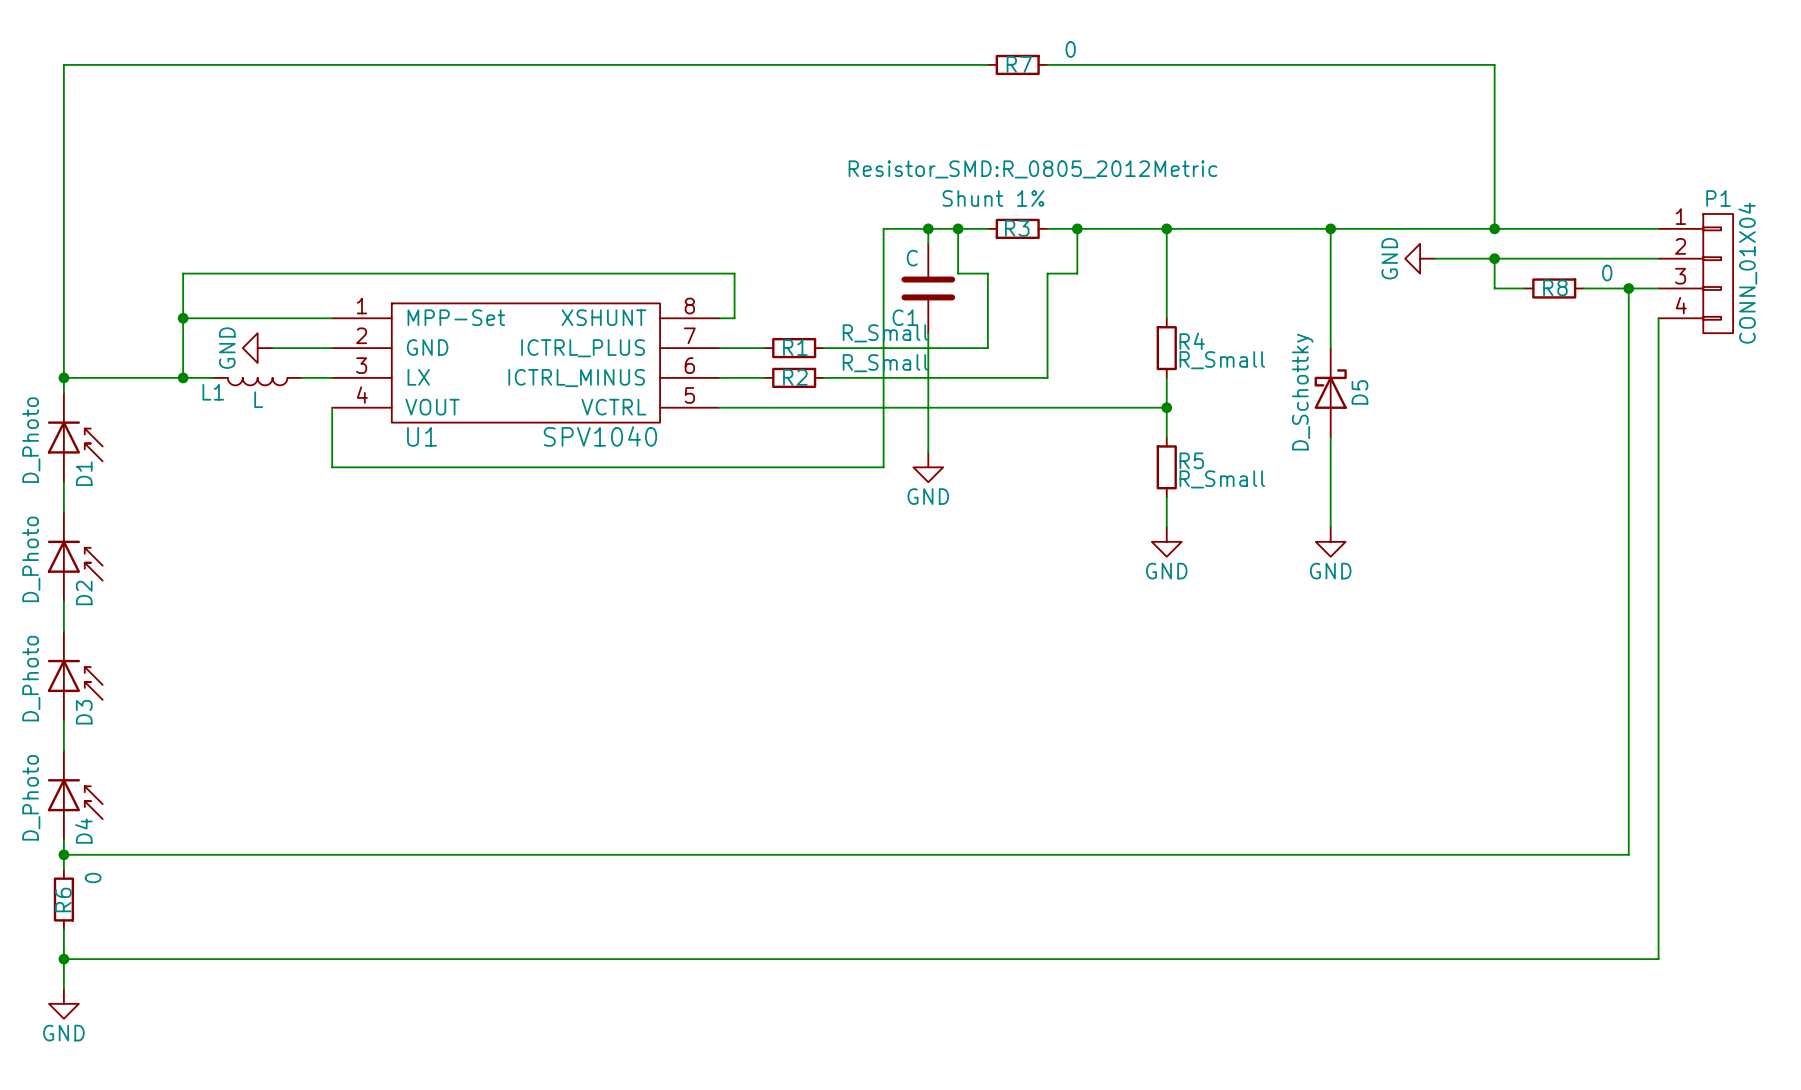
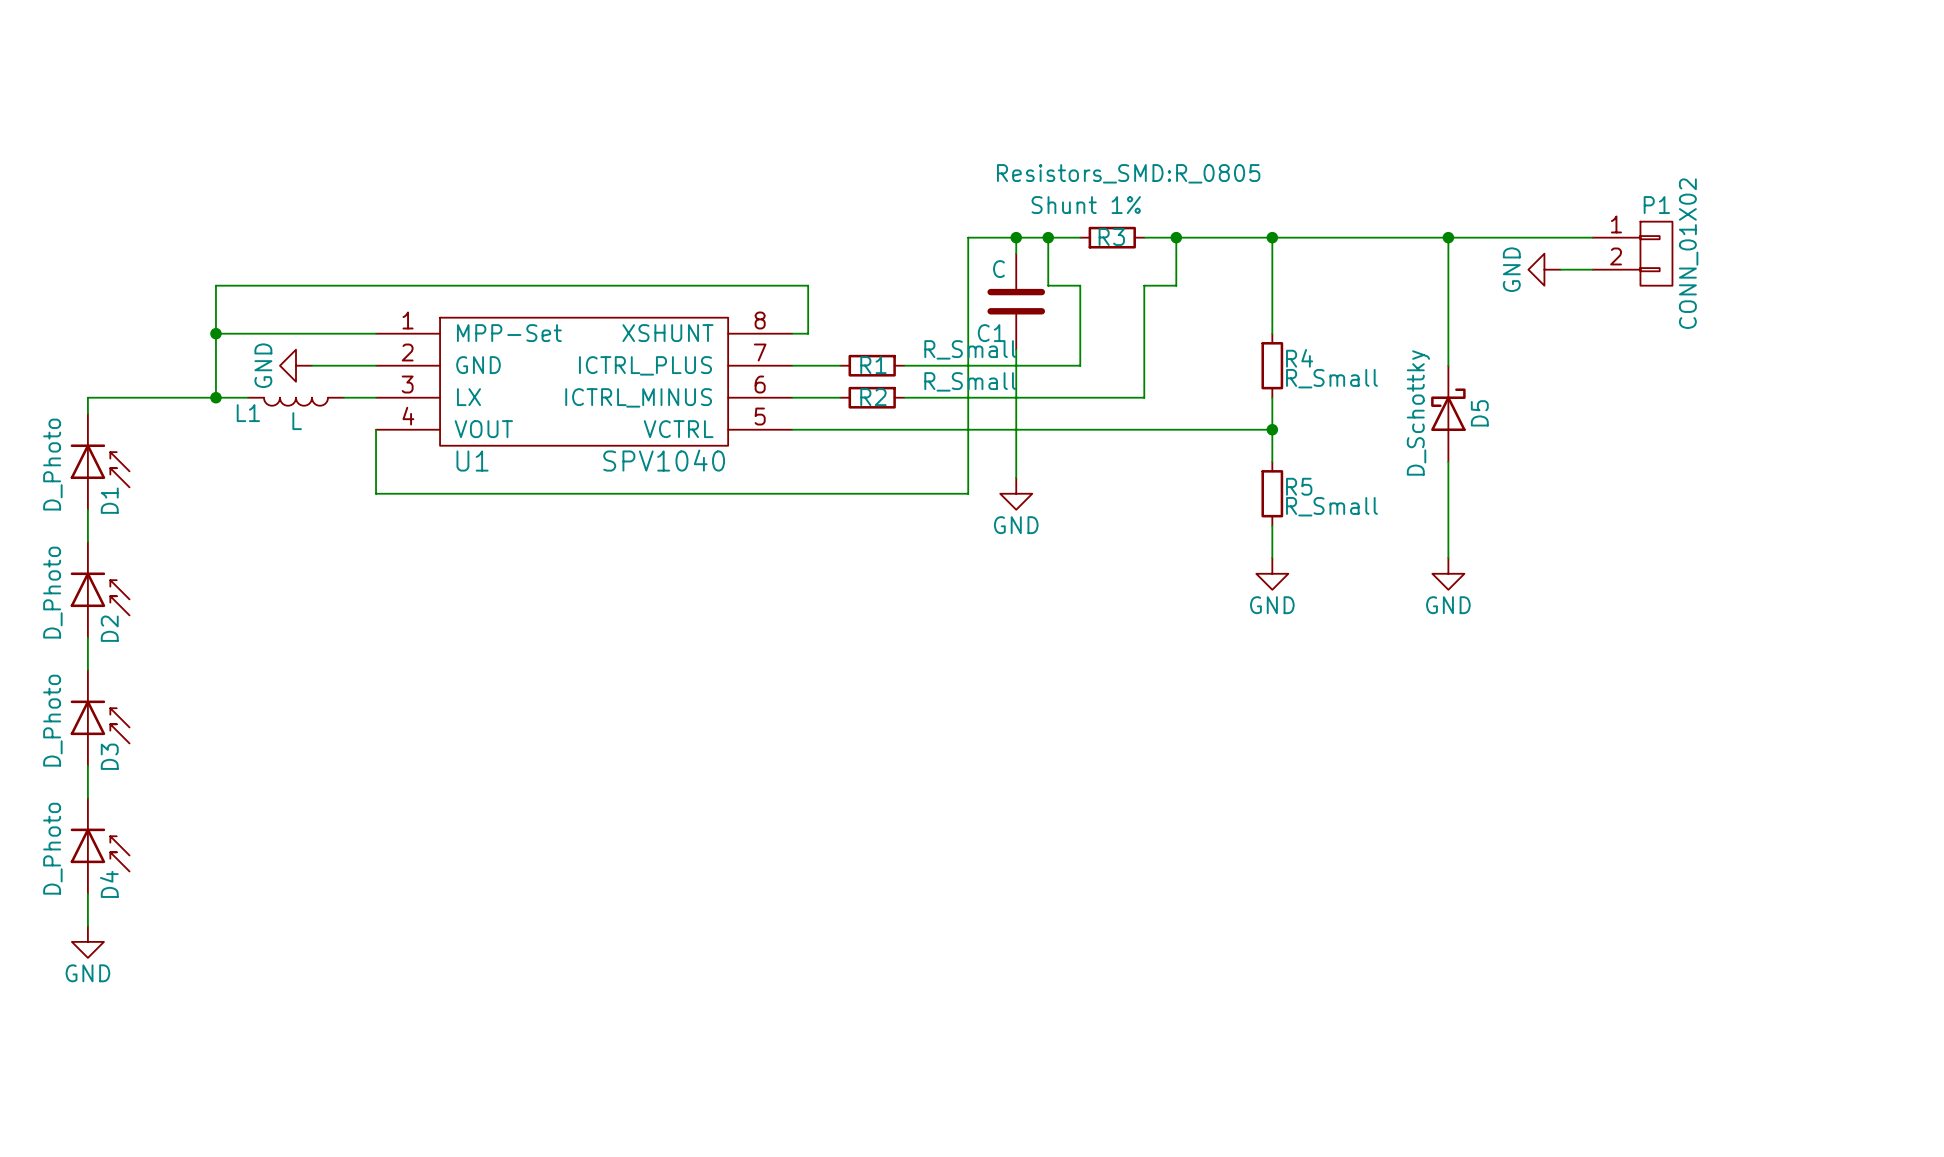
wire: (987, 64) (63, 64) (63, 377) -> none
R7: 0 (1017, 64) -> none
wire: (1047, 64) (1494, 64) (1494, 228) -> none
R3 text: Resistor_SMD:R_0805_2012Metric (1032, 169) -> Resistors_SMD:R_0805 (1128, 173)
P1 name position: P1 (1718, 198) -> P1 (1656, 205)
P1 symbol: [1658, 213, 1734, 334] -> [1592, 221, 1673, 286]
wire: (1464, 228) (1658, 228) -> none
junction: (1494, 228) -> none
wire: (1464, 258) (1658, 258) -> none
wire: (1494, 258) (1494, 288) (1524, 288) -> none
junction: (1494, 258) -> none
P1 value: CONN_01X04 (1747, 273) -> CONN_01X02 (1688, 253)
R8: 0 (1554, 288) -> none
wire: (1584, 288) (1658, 288) -> none
wire: (1628, 288) (1628, 854) (63, 854) -> none
junction: (1628, 288) -> none
wire: (1658, 318) (1658, 959) (63, 959) -> none
junction: (63, 377) -> none
junction: (63, 854) -> none
R6: 0 (63, 899) -> none
wire: (63, 929) (63, 988) -> none
junction: (63, 959) -> none
power symbol position: GND (63, 1003) -> GND (87, 941)

